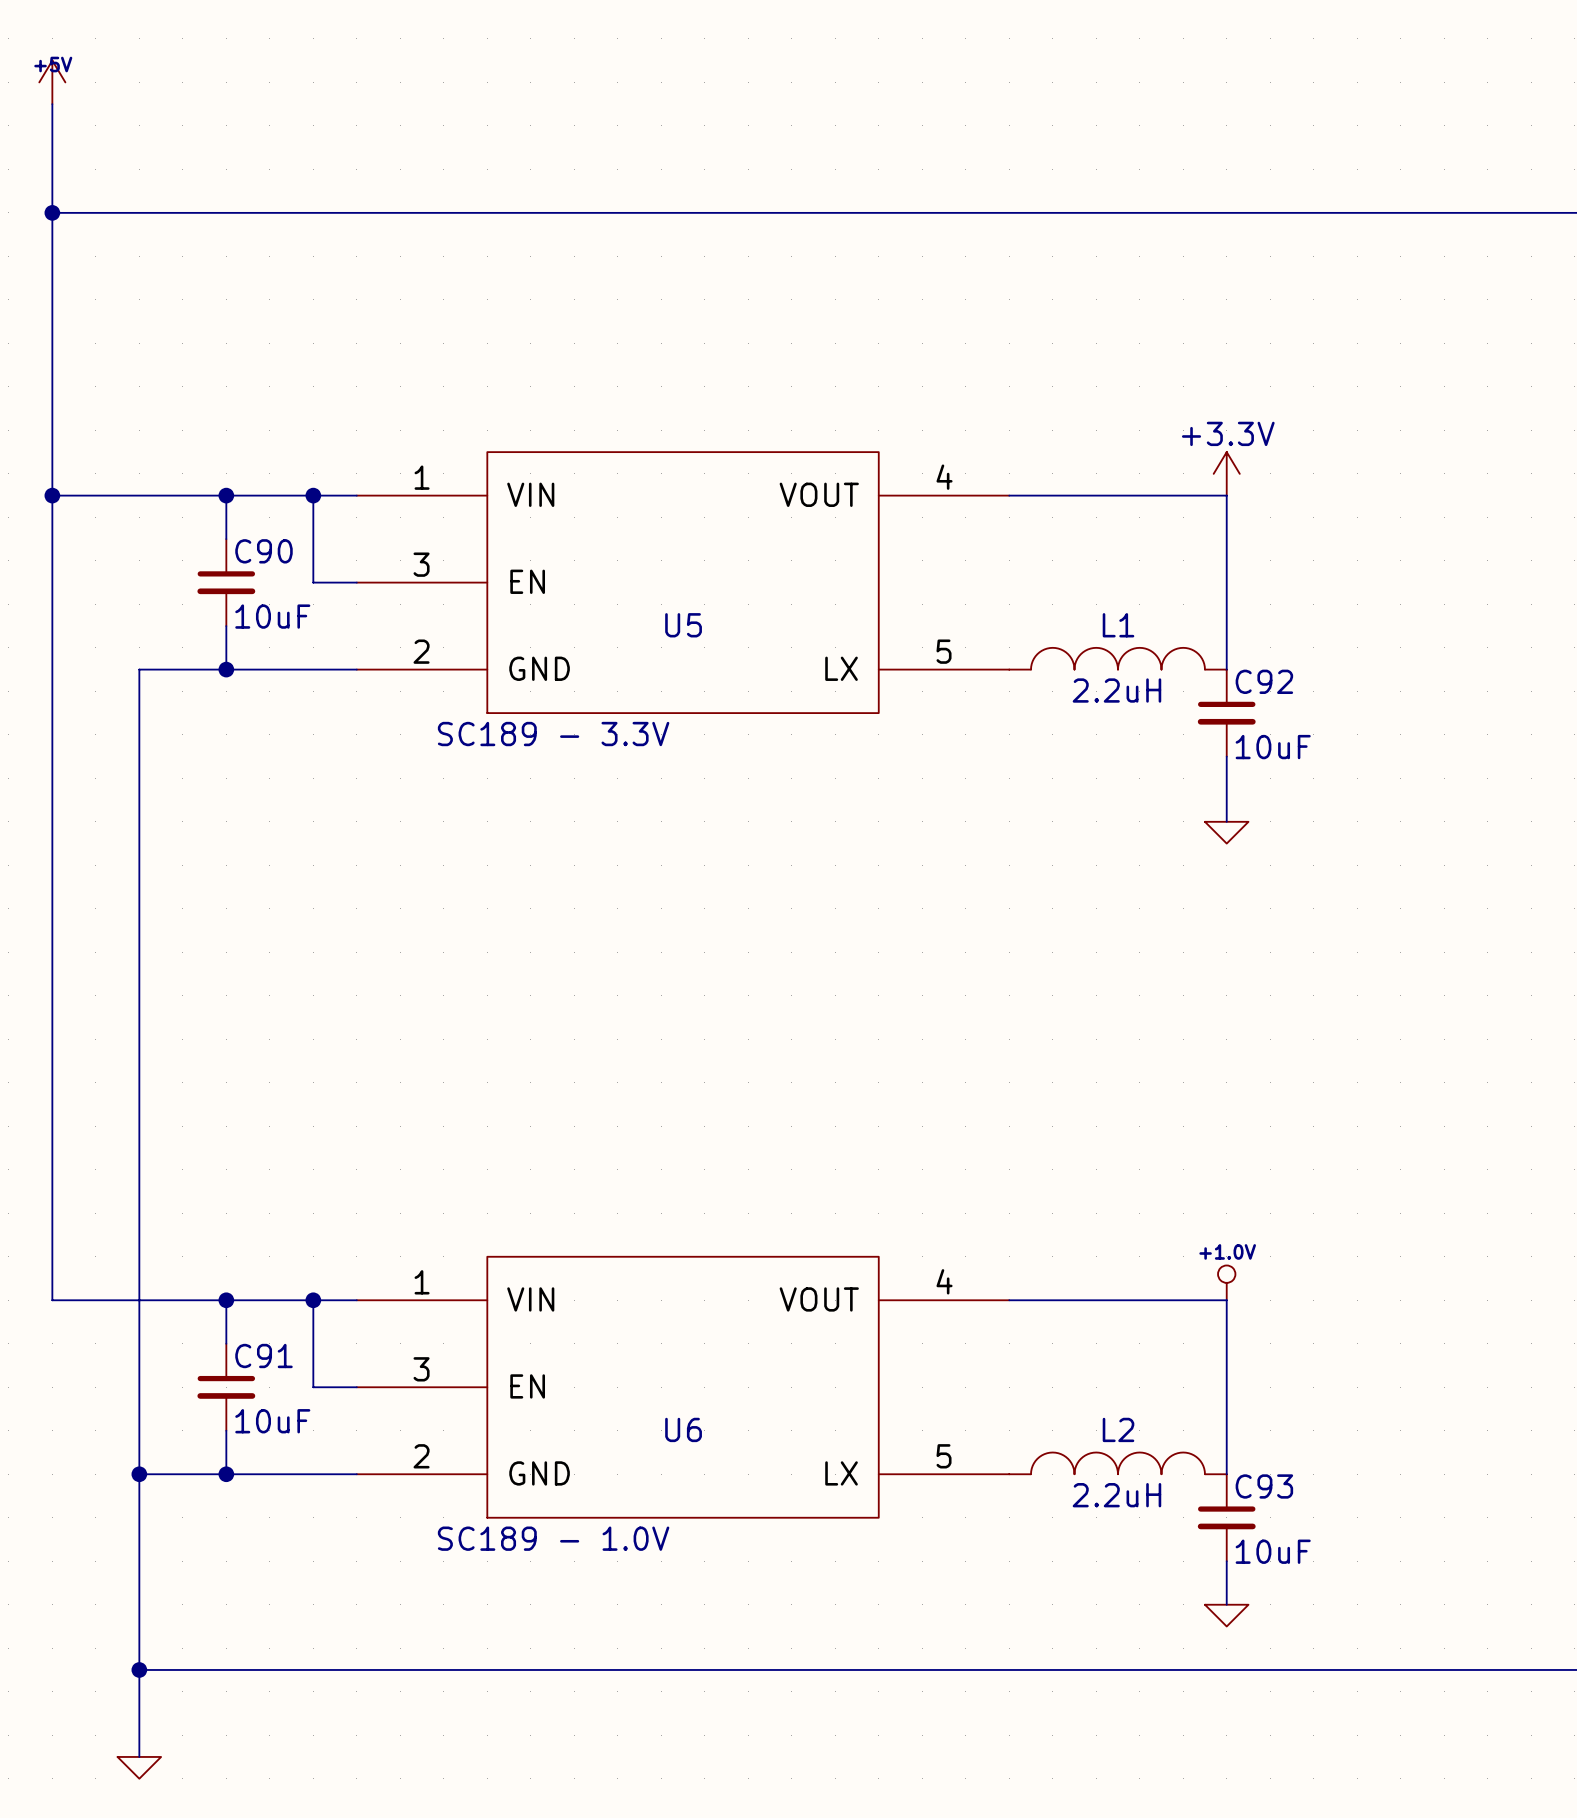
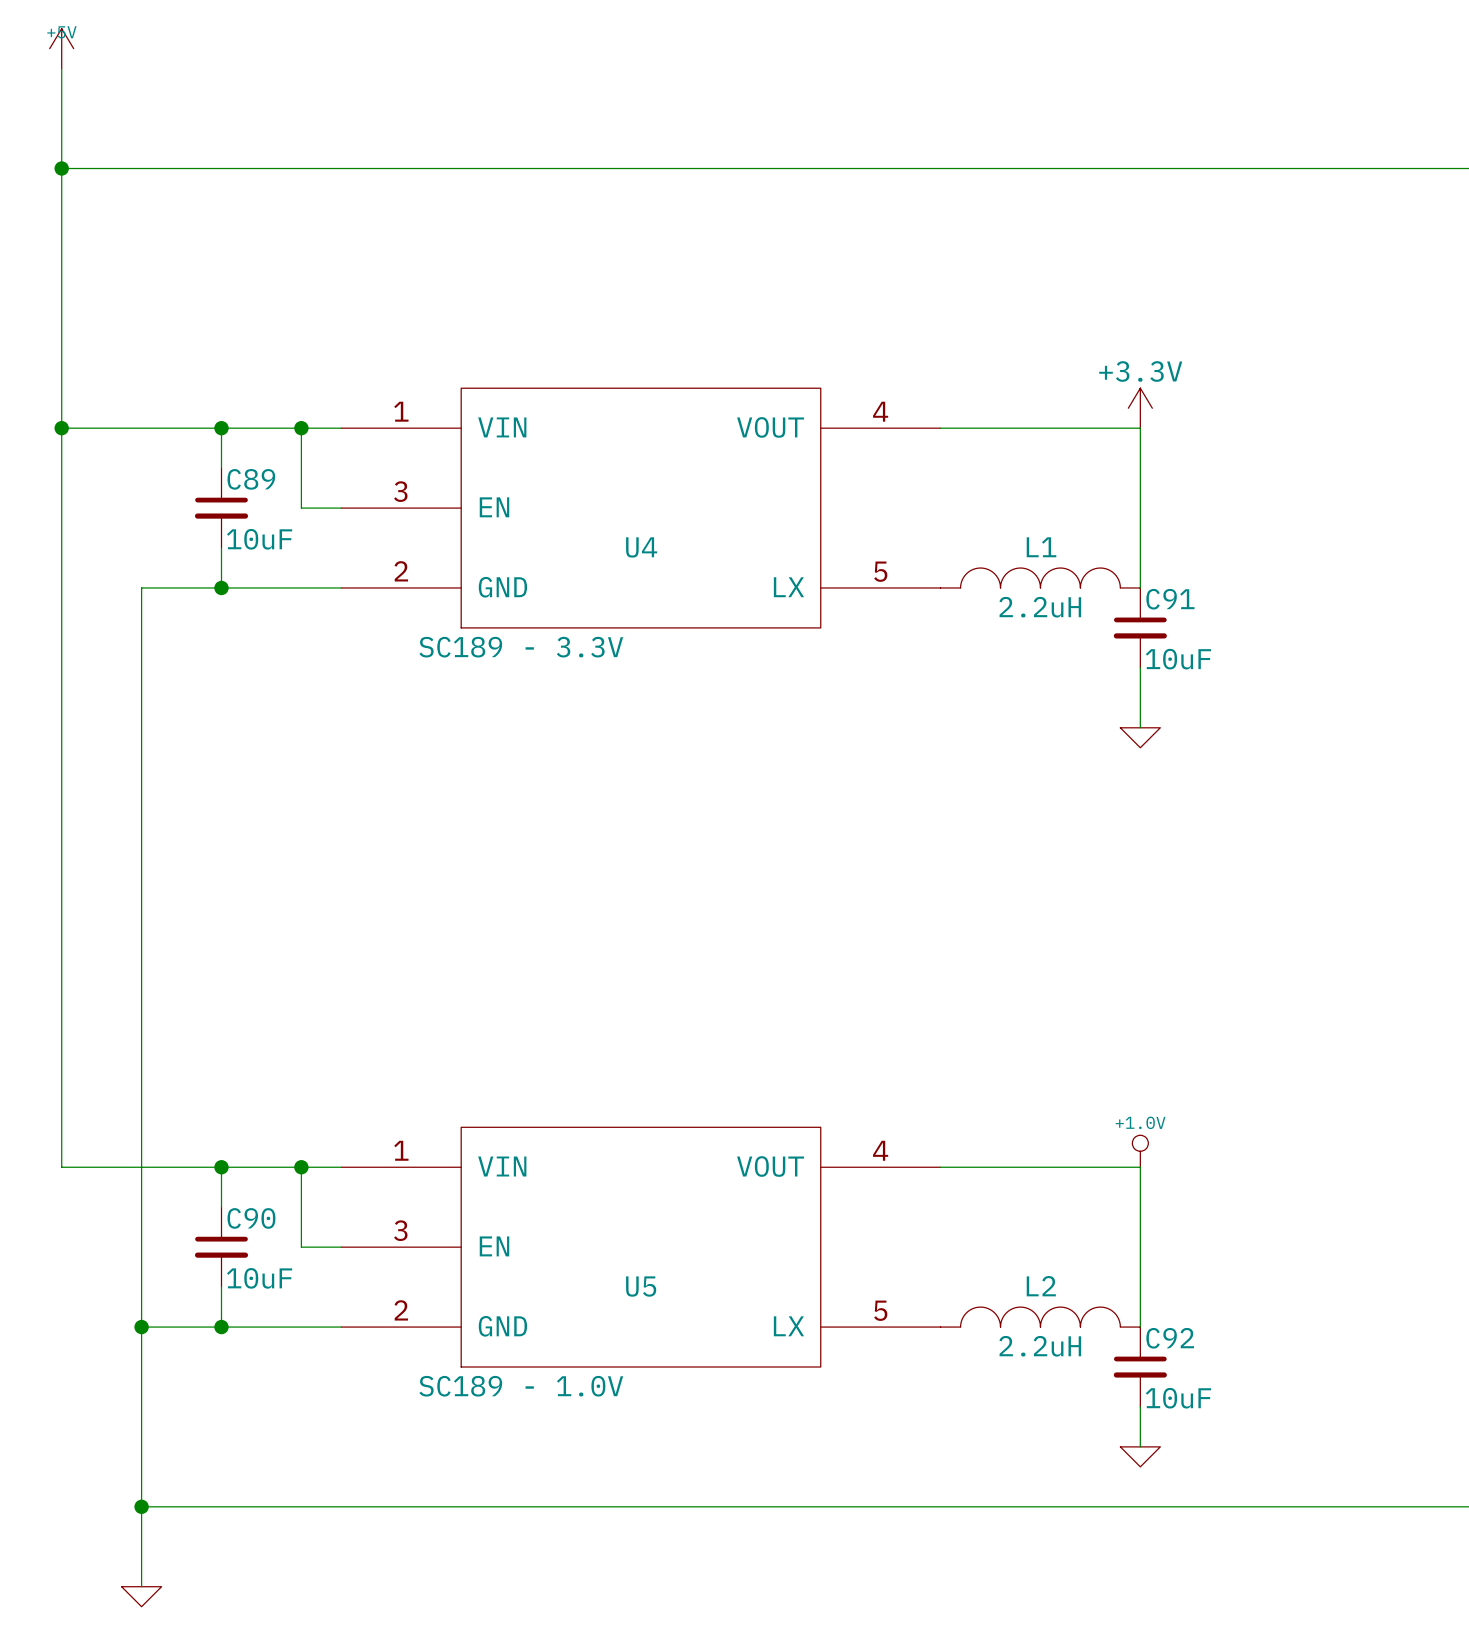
C90 name: C90 (263, 551) -> C89 (251, 479)
U5 name: U5 (683, 625) -> U4 (641, 547)
C92 name: C92 (1264, 681) -> C91 (1170, 599)
C91 name: C91 (263, 1356) -> C90 (251, 1218)
U6 name: U6 (683, 1429) -> U5 (641, 1286)
C93 name: C93 (1264, 1486) -> C92 (1170, 1338)

